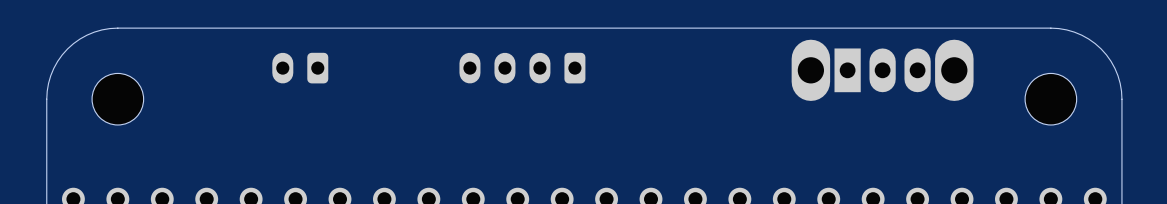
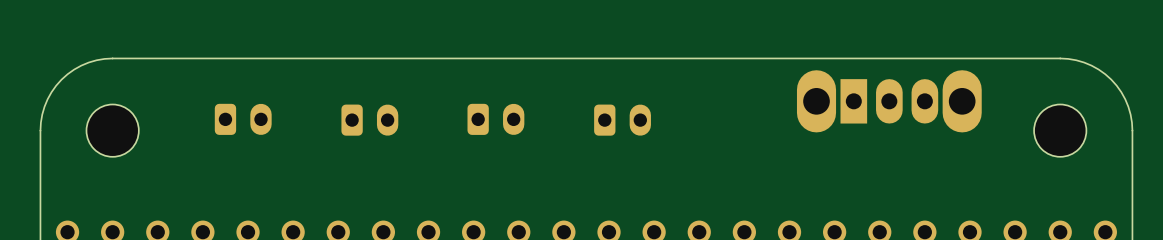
part: (300, 68) -> none
part: (522, 68) -> none
part: none -> (243, 119)
part: none -> (369, 120)
part: none -> (495, 119)
part: none -> (622, 120)

